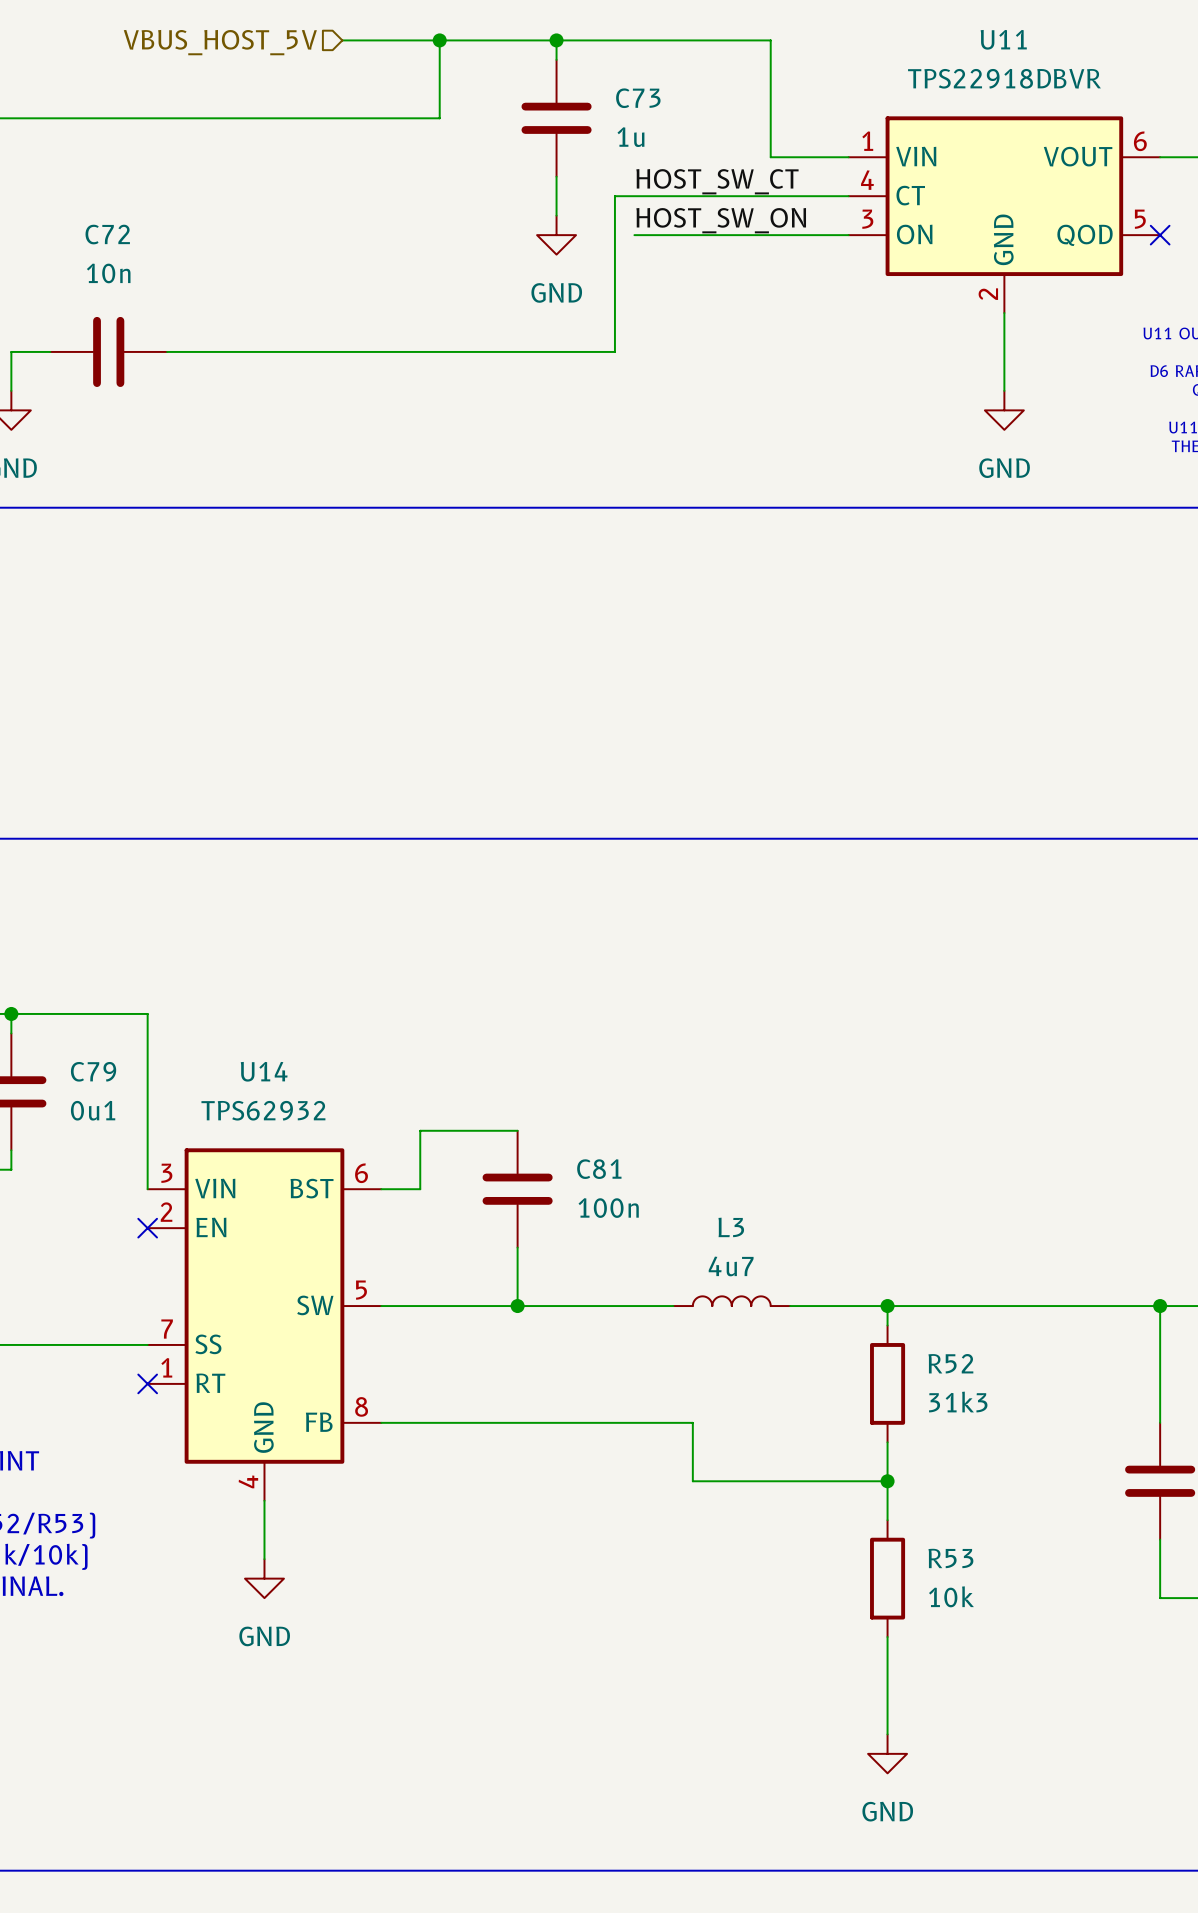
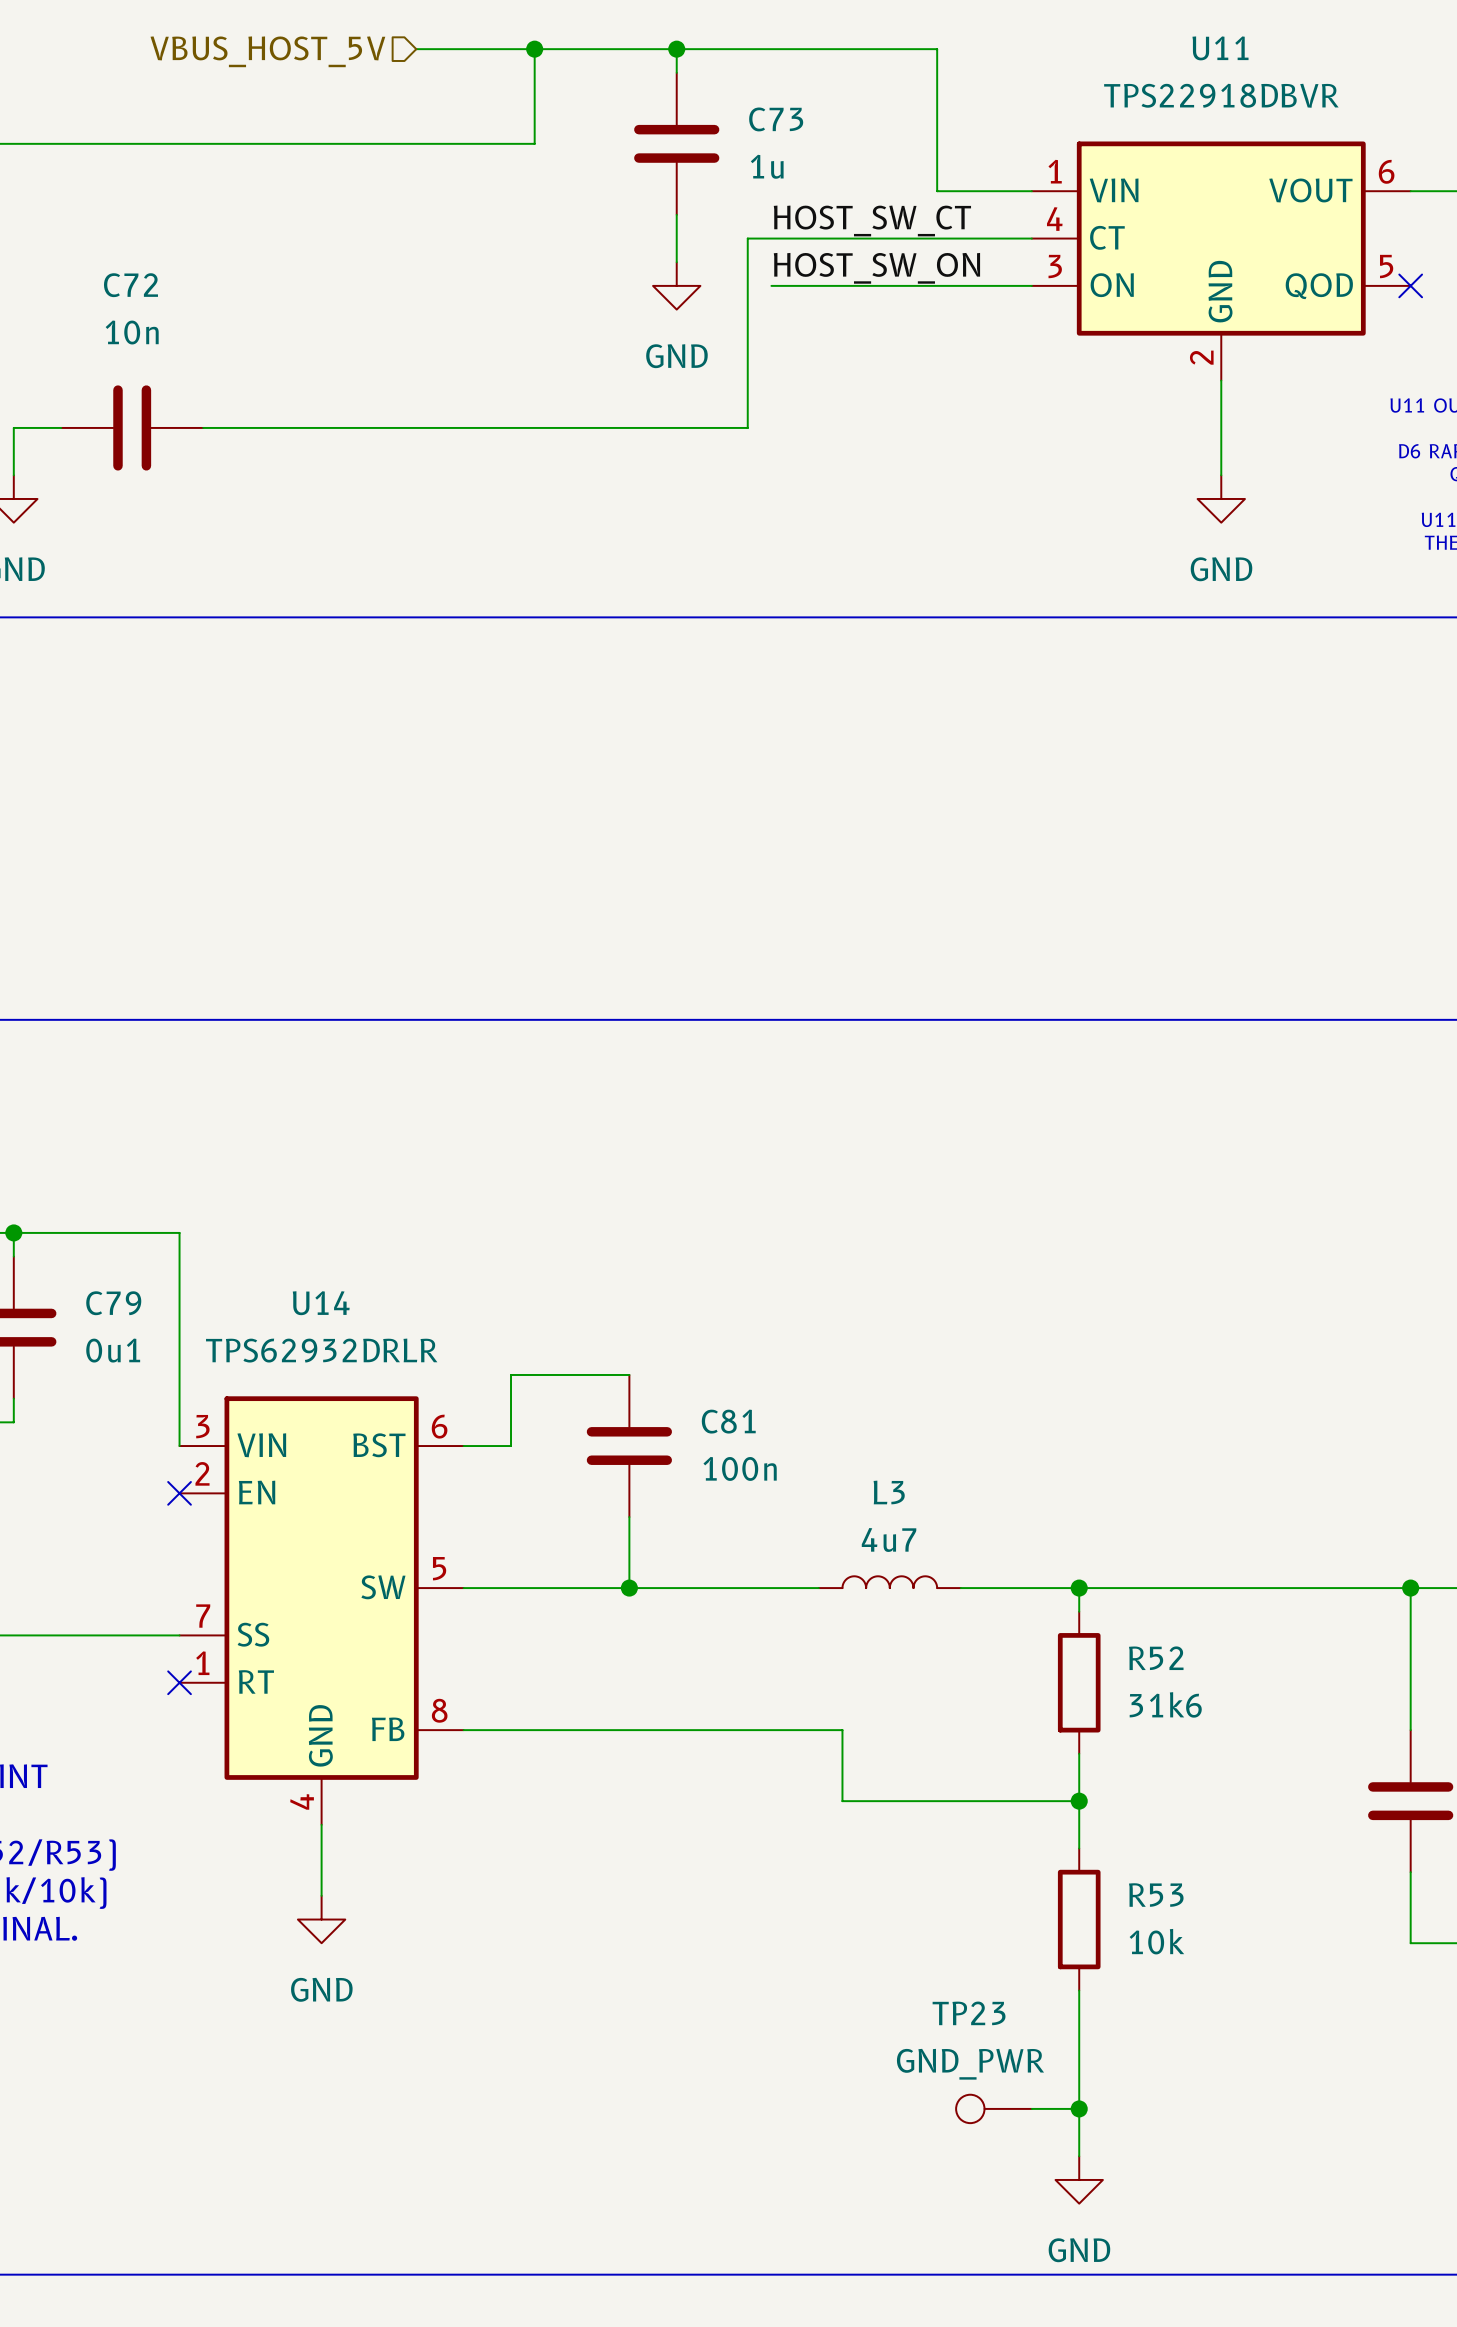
U14 value: TPS62932 (263, 1110) -> TPS62932DRLR (321, 1350)
R52 value: 31k3 (958, 1402) -> 31k6 (1165, 1704)
TP23: none -> GND_PWR (993, 2108)
wire: none -> (1031, 2108) (1079, 2108) (1079, 2156)
junction: none -> (1079, 2108)
power symbol position: GND (887, 1753) -> GND (1079, 2179)

